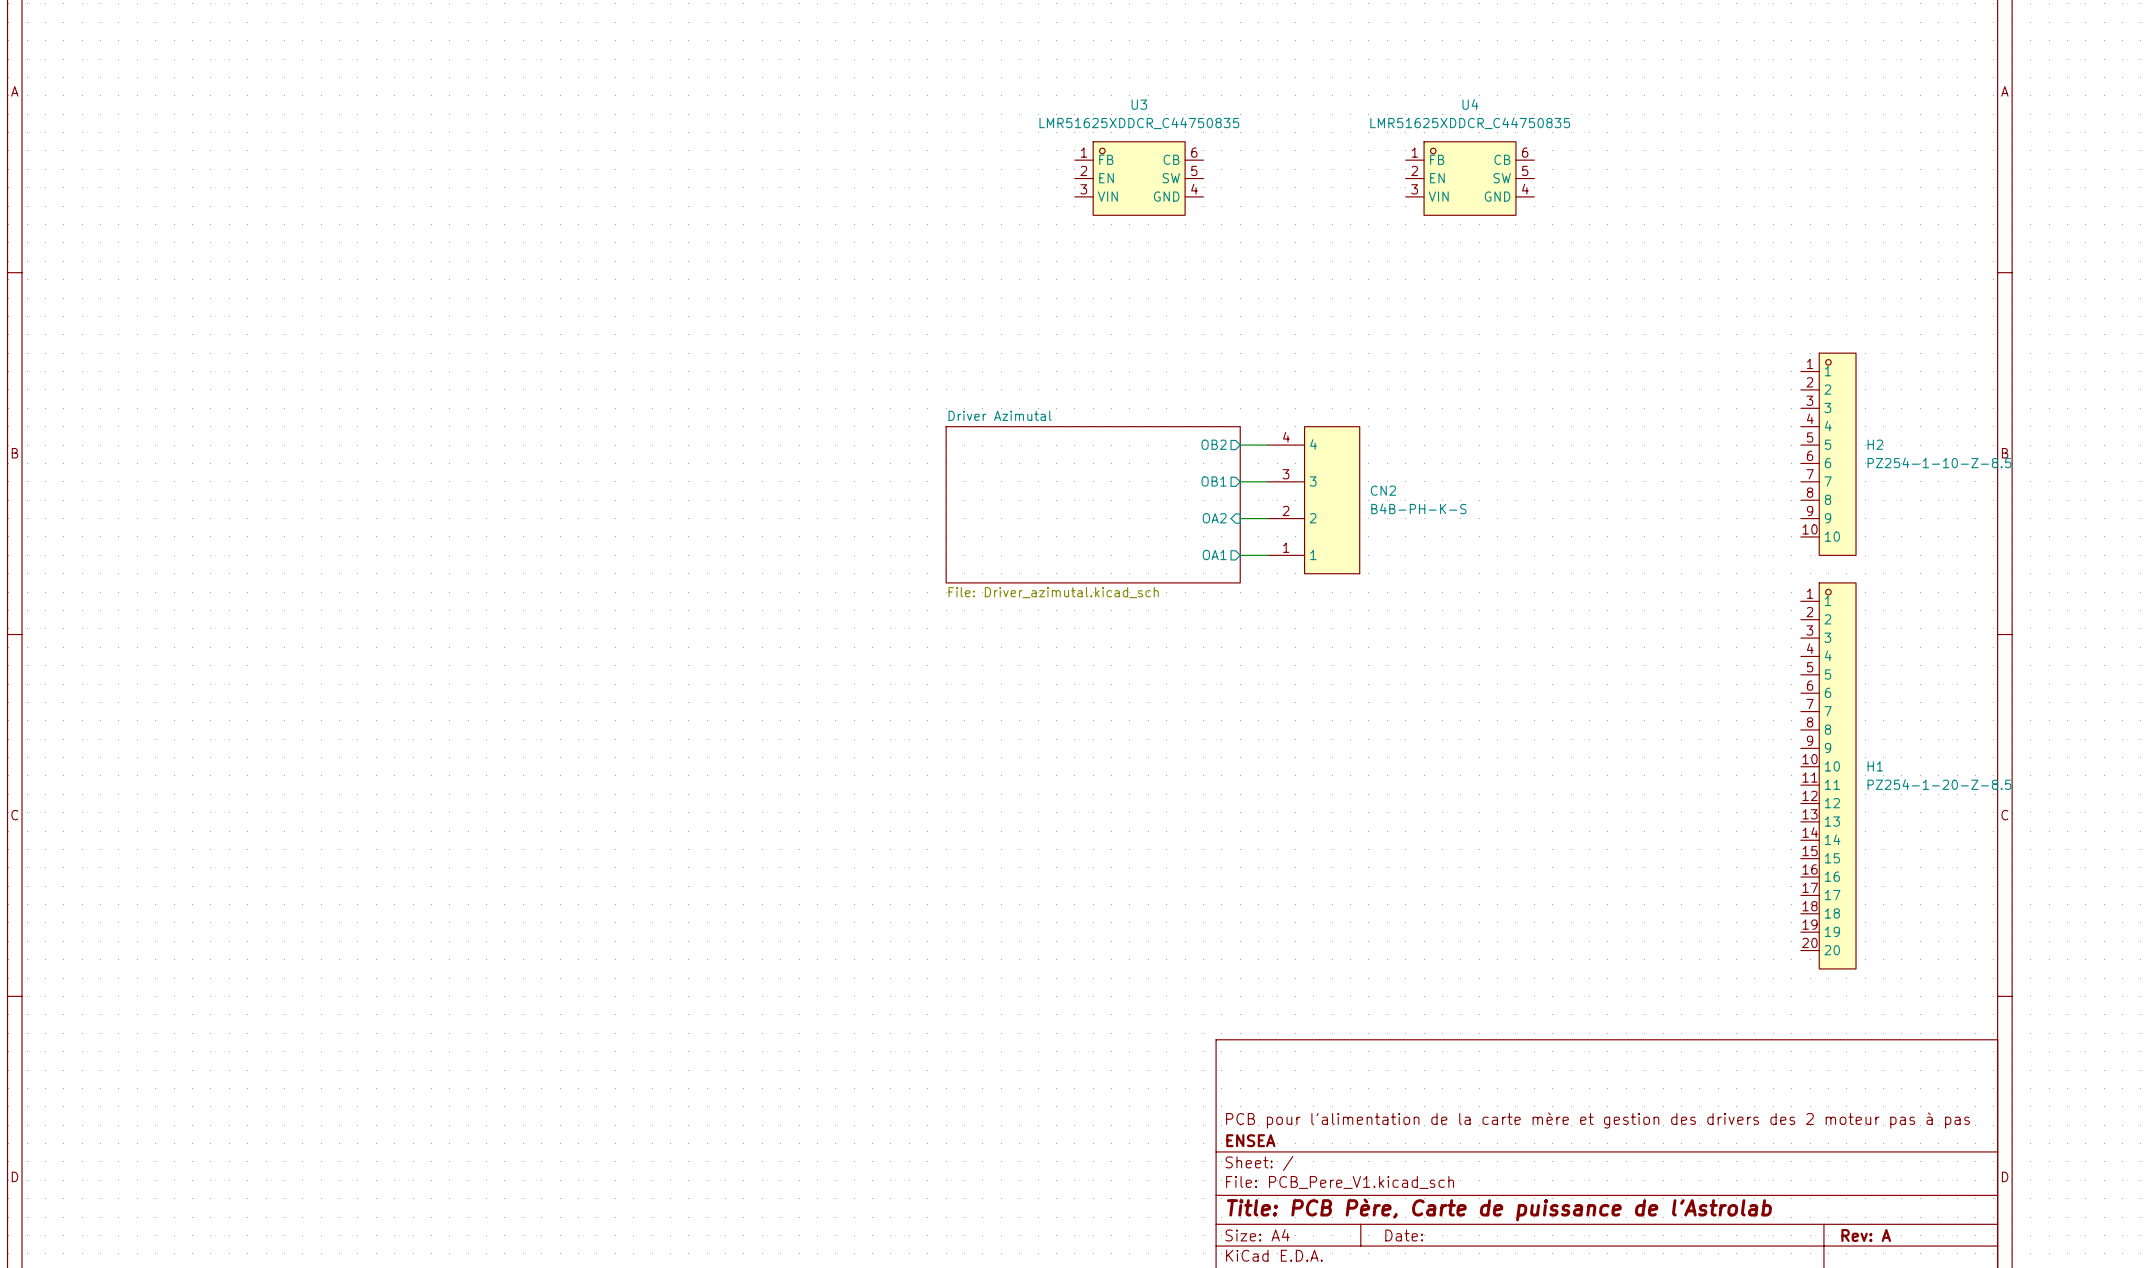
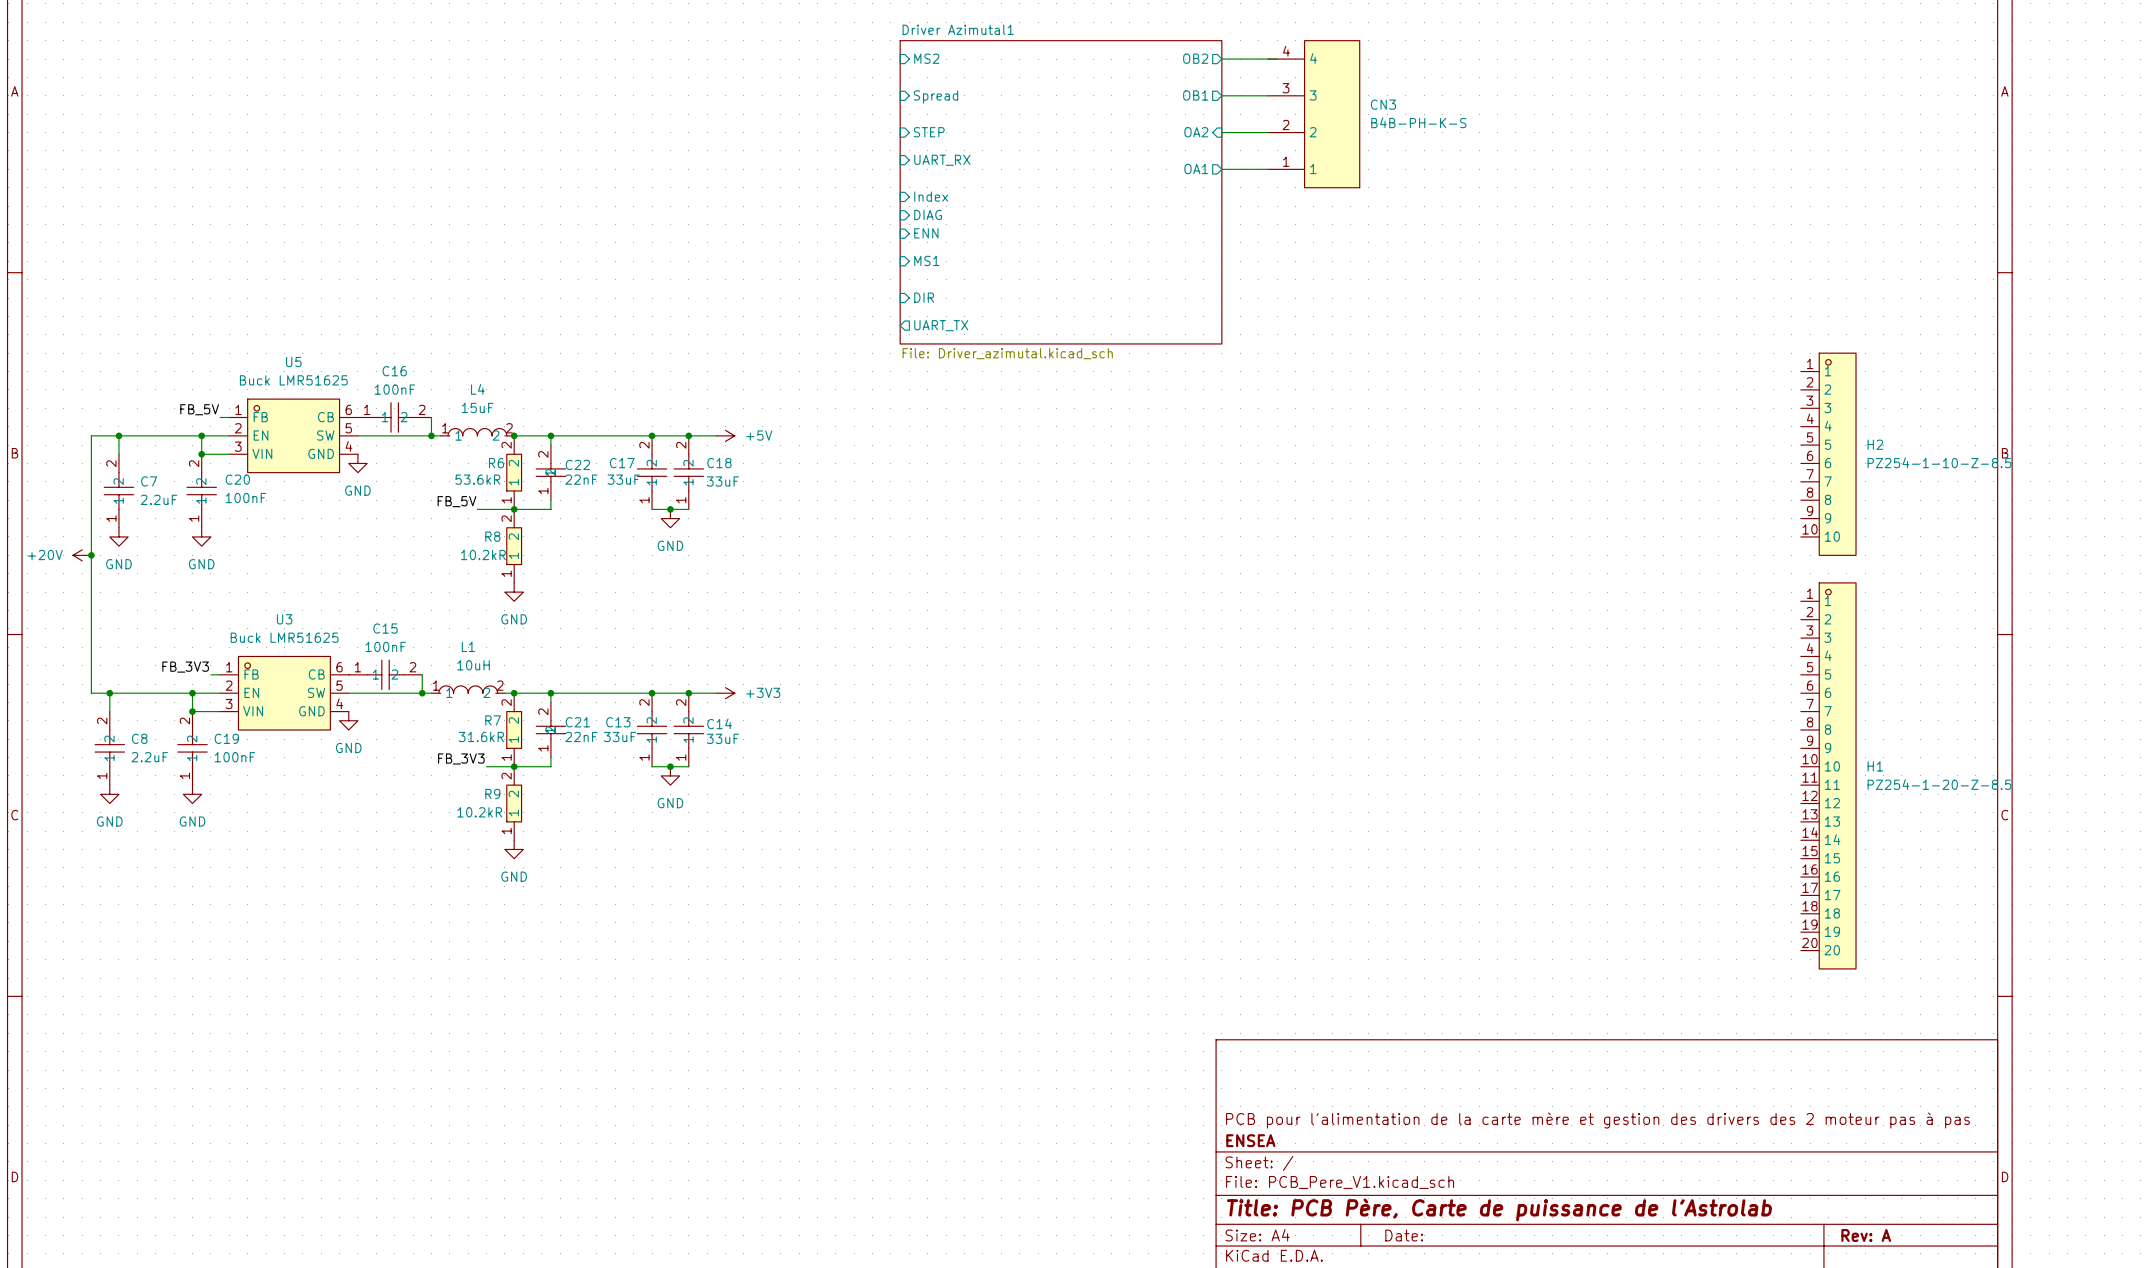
sheet pin: none -> MS2 (926, 58)
sheet pin: none -> OB2 (1195, 58)
wire: none -> (1221, 59) (1277, 59)
sheet pin: none -> OB1 (1195, 95)
wire: none -> (1221, 95) (1267, 95)
sheet pin: none -> Spread (935, 97)
CN3: none -> B4B-PH-K-S (1313, 114)
U3 value: LMR51625XDDCR_C44750835 (1139, 123) -> Buck LMR51625 (284, 637)
sheet pin: none -> STEP (929, 132)
sheet pin: none -> OA2 (1196, 132)
wire: none -> (1221, 132) (1267, 132)
sheet pin: none -> UART_RX (942, 160)
sheet pin: none -> OA1 (1196, 169)
wire: none -> (1221, 169) (1267, 169)
U3 position: (1139, 178) -> (284, 693)
U4: LMR51625XDDCR_C44750835 (1470, 178) -> none
sheet Driver Azimutal1: none -> File: Driver_azimutal.kicad_sch (1061, 192)
sheet pin: none -> Index (931, 196)
sheet pin: none -> DIAG (928, 214)
sheet pin: none -> ENN (926, 233)
sheet pin: none -> MS1 (926, 260)
sheet pin: none -> DIR (924, 297)
sheet pin: none -> UART_TX (941, 325)
label: none -> FB_5V (199, 409)
wire: none -> (220, 417) (229, 417)
C16: none -> 100nF (394, 417)
wire: none -> (431, 417) (431, 435)
L4: none -> 15uF (477, 432)
wire: none -> (118, 435) (118, 454)
junction: none -> (118, 435)
wire: none -> (201, 435) (201, 454) (229, 454)
junction: none -> (201, 435)
wire: none -> (229, 435) (91, 435) (91, 693) (220, 693)
U5: none -> Buck LMR51625 (293, 435)
wire: none -> (357, 435) (440, 435)
junction: none -> (431, 435)
wire: none -> (514, 435) (716, 435)
junction: none -> (514, 435)
wire: none -> (550, 435) (550, 445)
junction: none -> (550, 435)
junction: none -> (652, 435)
junction: none -> (688, 435)
power symbol: none -> +5V (725, 435)
sheet pin: OB2 (1214, 444) -> none
wire: (1240, 445) (1267, 445) -> none
junction: none -> (201, 454)
power symbol: none -> GND (357, 463)
R6: none -> 53.6kR (514, 472)
C22: none -> 22nF (550, 472)
C17: none -> 33uF (652, 472)
C18: none -> 33uF (688, 472)
sheet pin: OB1 (1214, 481) -> none
wire: (1240, 481) (1267, 481) -> none
C7: none -> 2.2uF (118, 491)
C20: none -> 100nF (201, 491)
wire: none -> (550, 500) (550, 509) (477, 509)
CN2: B4B-PH-K-S (1313, 500) -> none
label: none -> FB_5V (456, 501)
sheet Driver Azimutal: File: Driver_azimutal.kicad_sch (1093, 504) -> none
junction: none -> (514, 509)
wire: none -> (652, 509) (688, 509)
junction: none -> (670, 509)
power symbol: none -> GND (670, 518)
sheet pin: OA2 (1214, 518) -> none
wire: (1240, 518) (1267, 518) -> none
power symbol: none -> GND (118, 536)
power symbol: none -> GND (201, 536)
R8: none -> 10.2kR (514, 546)
power symbol: none -> +20V (82, 555)
junction: none -> (91, 555)
sheet pin: OA1 (1214, 555) -> none
wire: (1240, 555) (1267, 555) -> none
power symbol: none -> GND (514, 592)
label: none -> FB_3V3 (185, 667)
wire: none -> (210, 674) (220, 674)
C15: none -> 100nF (385, 674)
wire: none -> (422, 674) (422, 693)
L1: none -> 10uH (468, 689)
wire: none -> (109, 693) (109, 711)
junction: none -> (109, 693)
wire: none -> (192, 693) (192, 711) (220, 711)
junction: none -> (192, 693)
wire: none -> (348, 693) (431, 693)
junction: none -> (422, 693)
wire: none -> (504, 693) (716, 693)
junction: none -> (514, 693)
wire: none -> (550, 693) (550, 702)
junction: none -> (550, 693)
junction: none -> (652, 693)
junction: none -> (688, 693)
power symbol: none -> +3V3 (725, 693)
junction: none -> (192, 711)
power symbol: none -> GND (348, 720)
R7: none -> 31.6kR (514, 729)
C21: none -> 22nF (550, 729)
C13: none -> 33uF (652, 729)
C14: none -> 33uF (688, 729)
C8: none -> 2.2uF (109, 748)
C19: none -> 100nF (192, 748)
wire: none -> (550, 757) (550, 766) (486, 766)
label: none -> FB_3V3 (461, 758)
junction: none -> (514, 766)
wire: none -> (652, 766) (688, 766)
junction: none -> (670, 766)
power symbol: none -> GND (670, 775)
power symbol: none -> GND (109, 794)
power symbol: none -> GND (192, 794)
R9: none -> 10.2kR (514, 803)
power symbol: none -> GND (514, 849)

